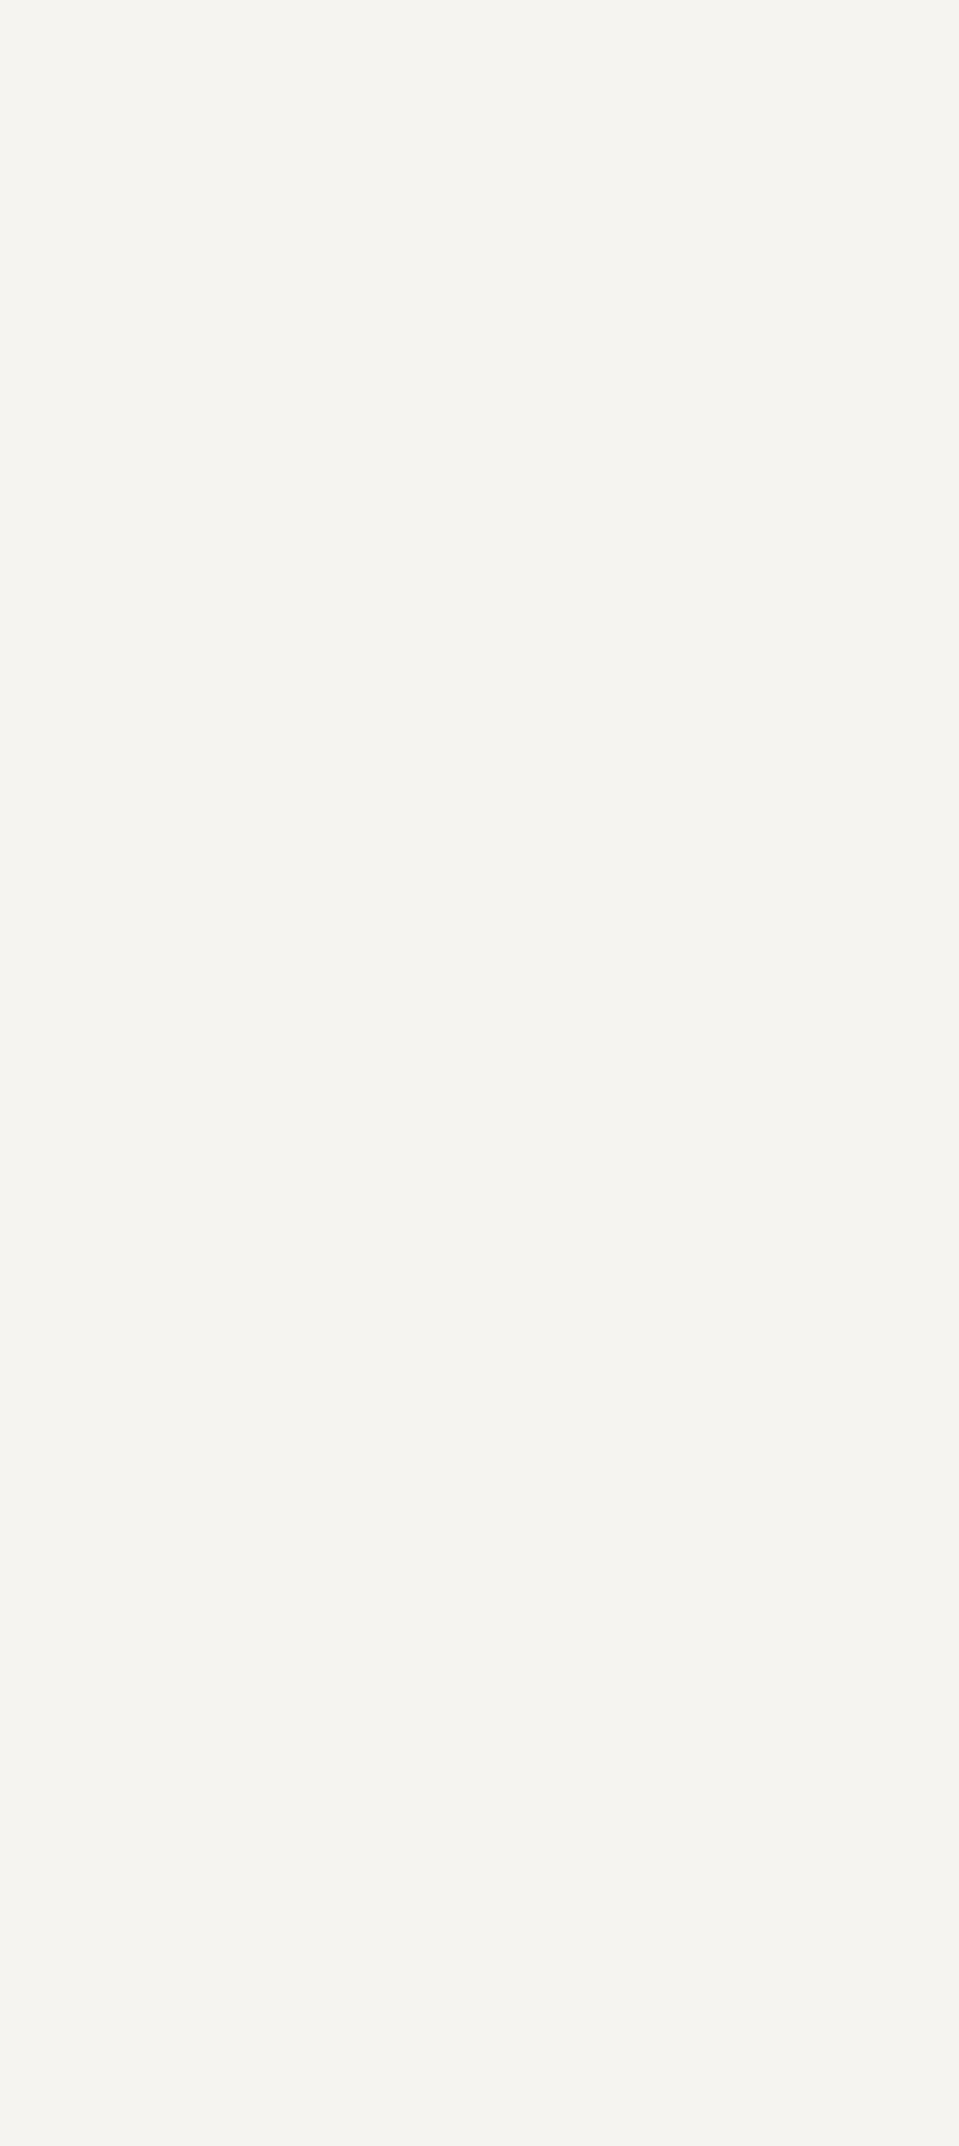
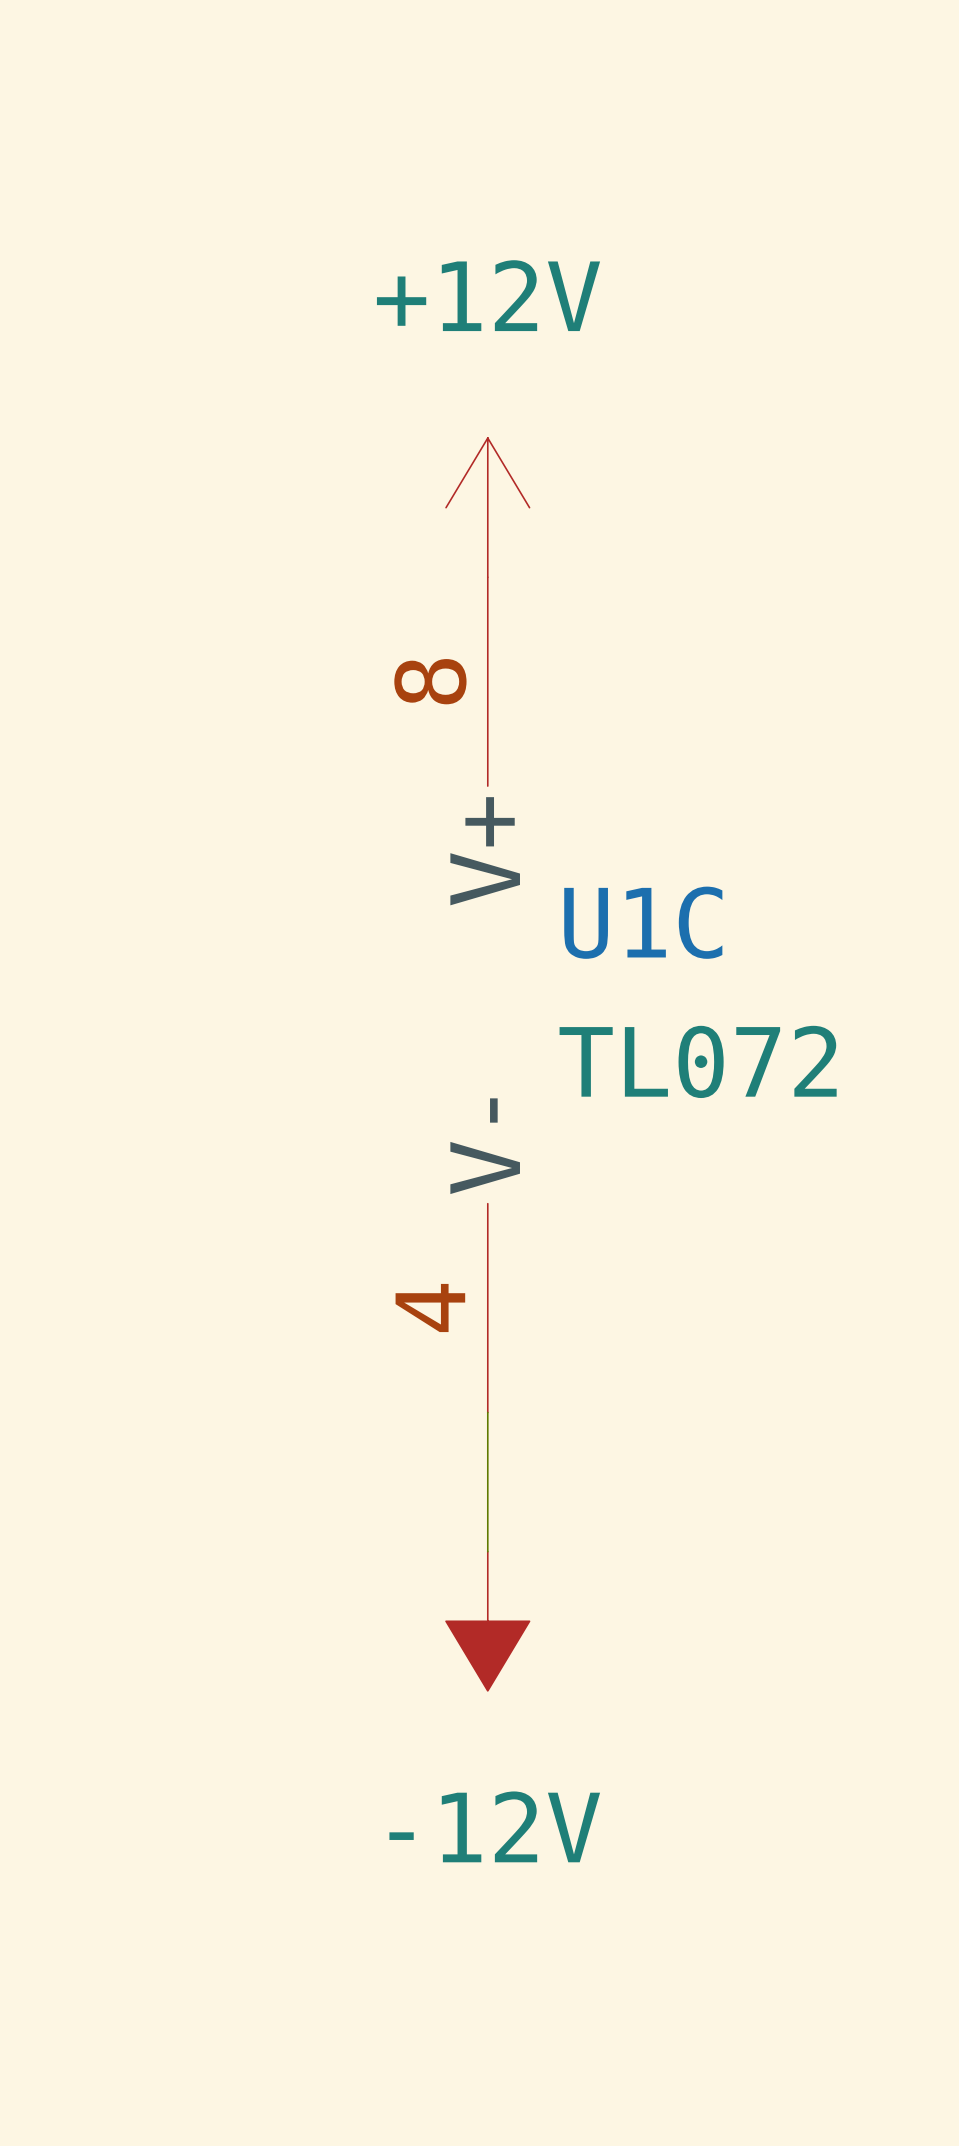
power symbol: none -> +12V (487, 507)
U1C: none -> TL072 (487, 994)
wire: none -> (487, 1412) (487, 1551)
power symbol: none -> -12V (487, 1621)

